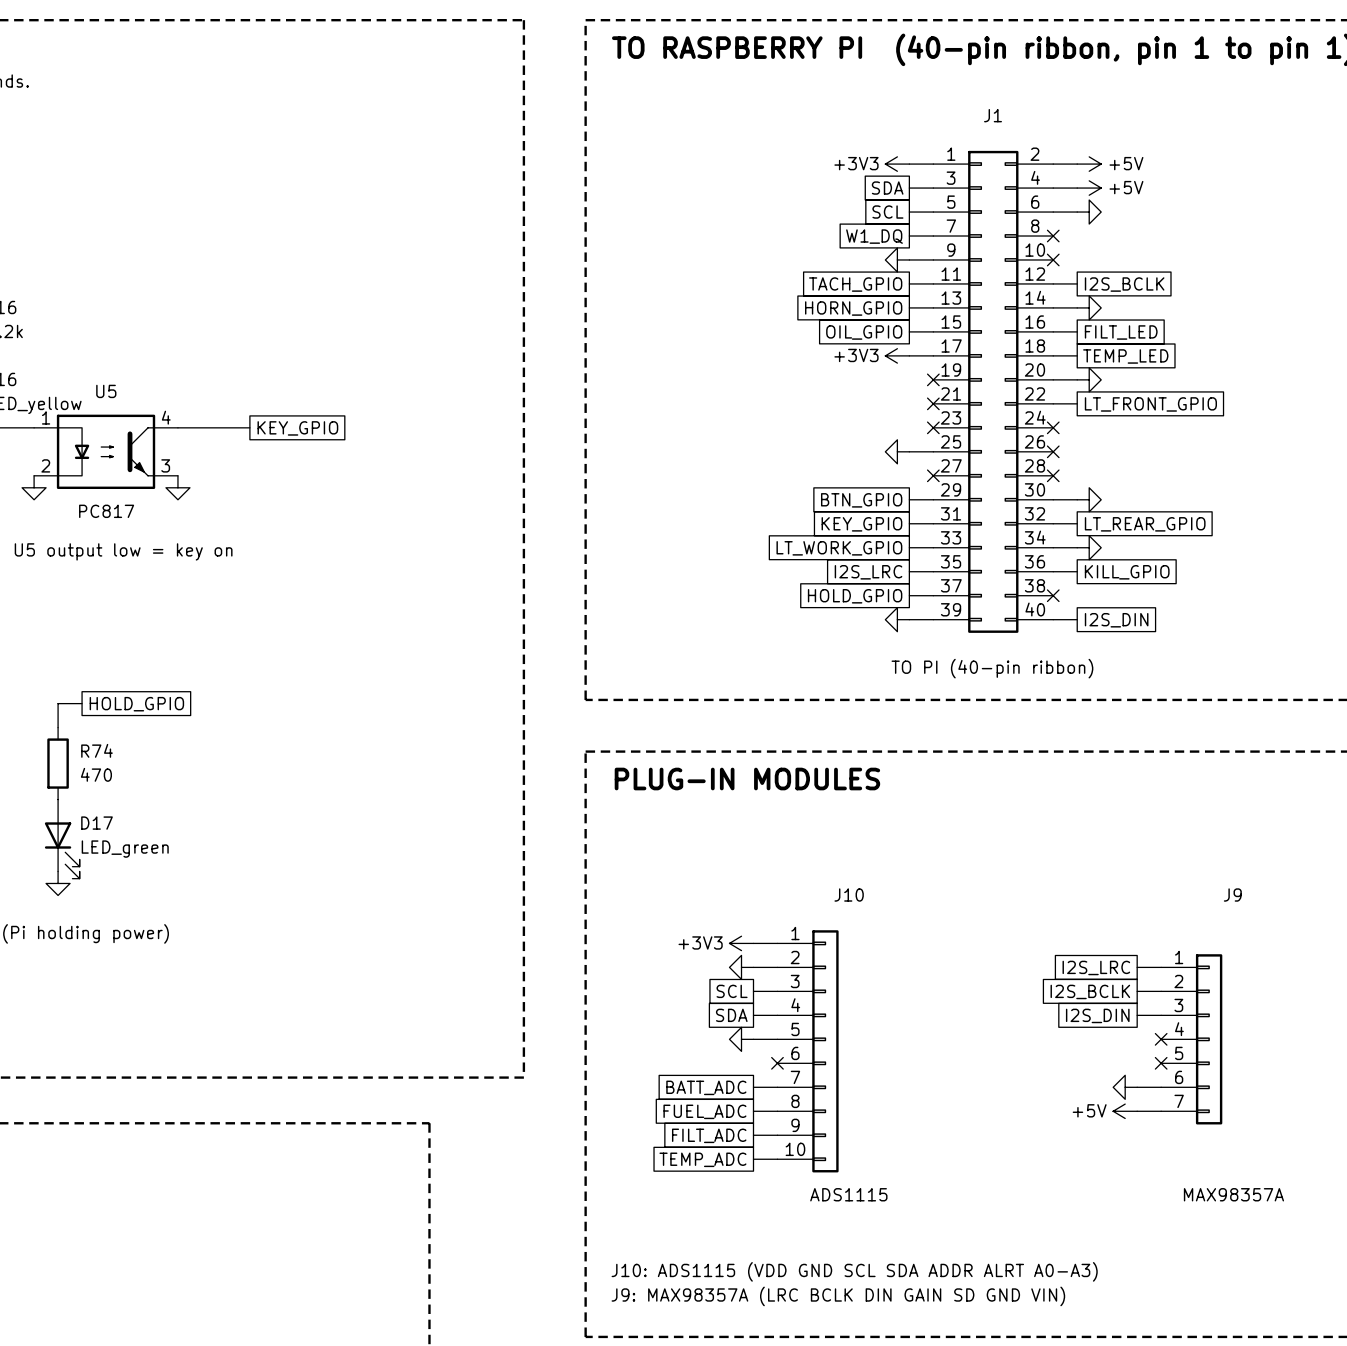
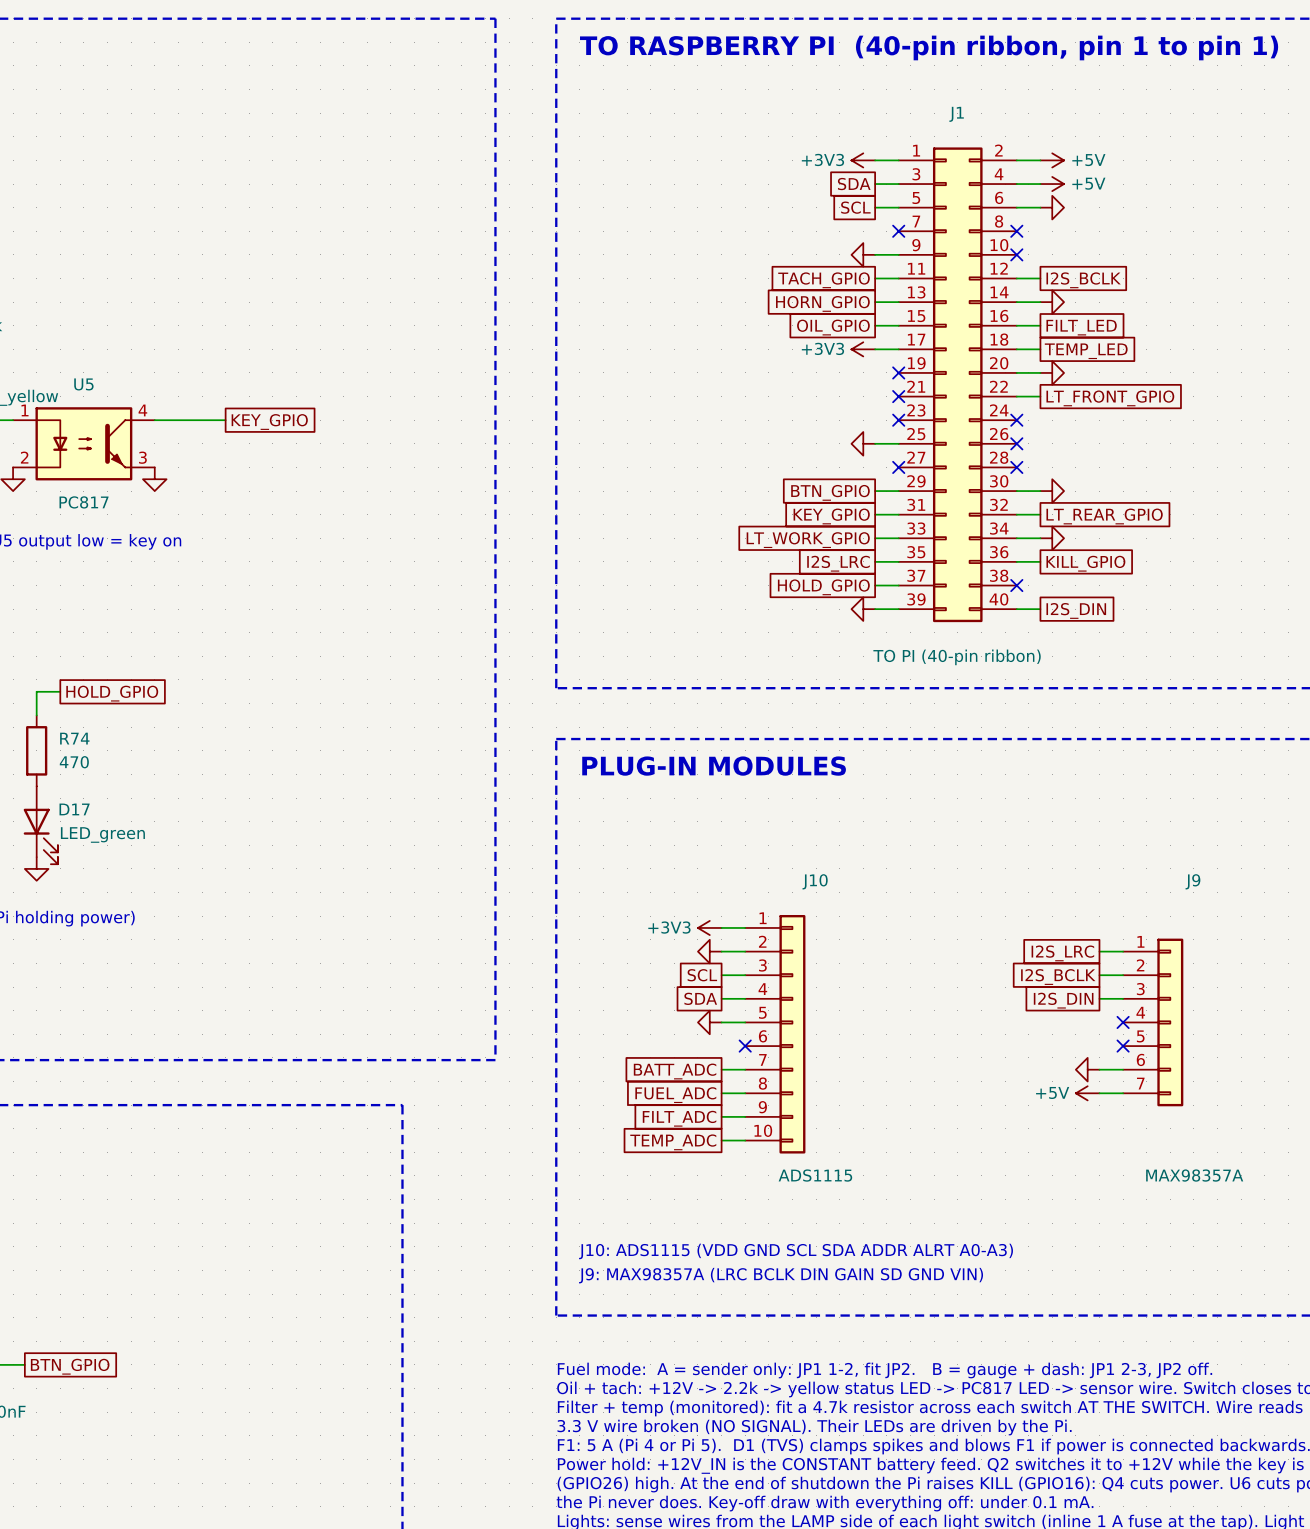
global label: W1_DQ (874, 236) -> none
wire: (909, 236) (933, 236) -> none
no-connect mark: none -> (898, 231)

